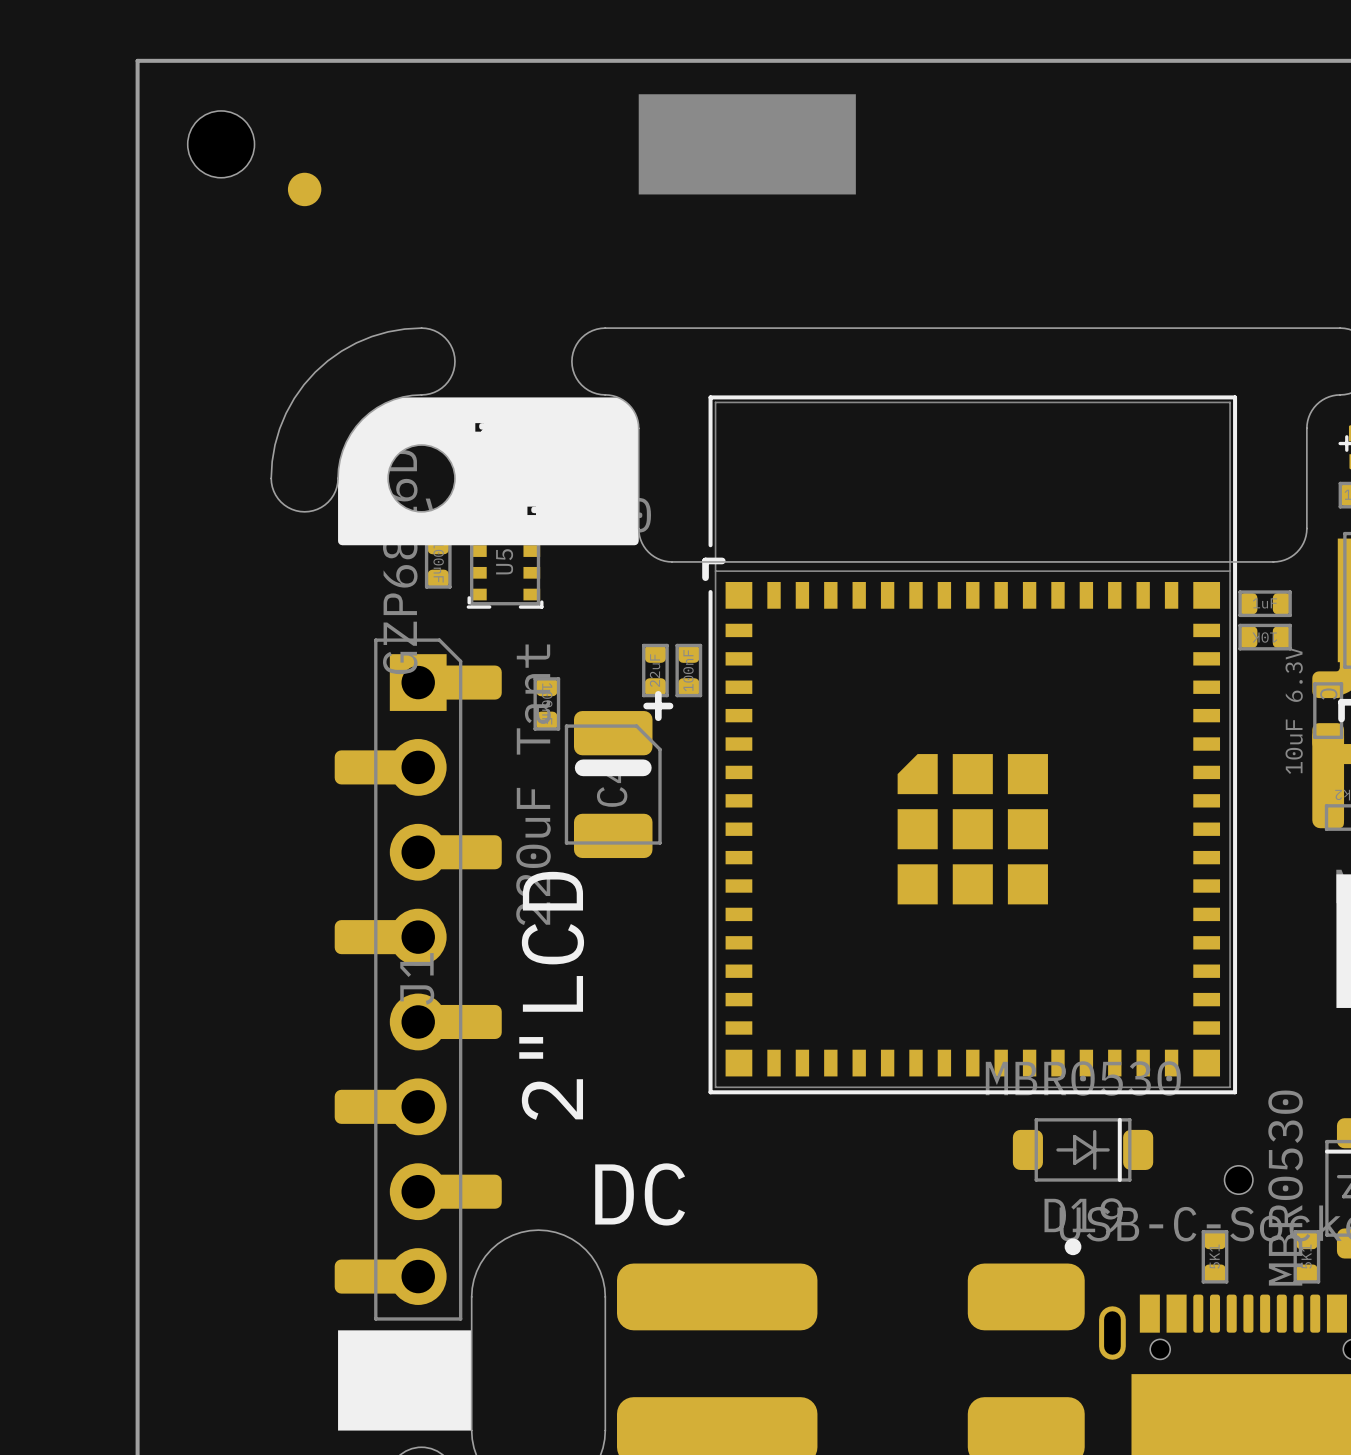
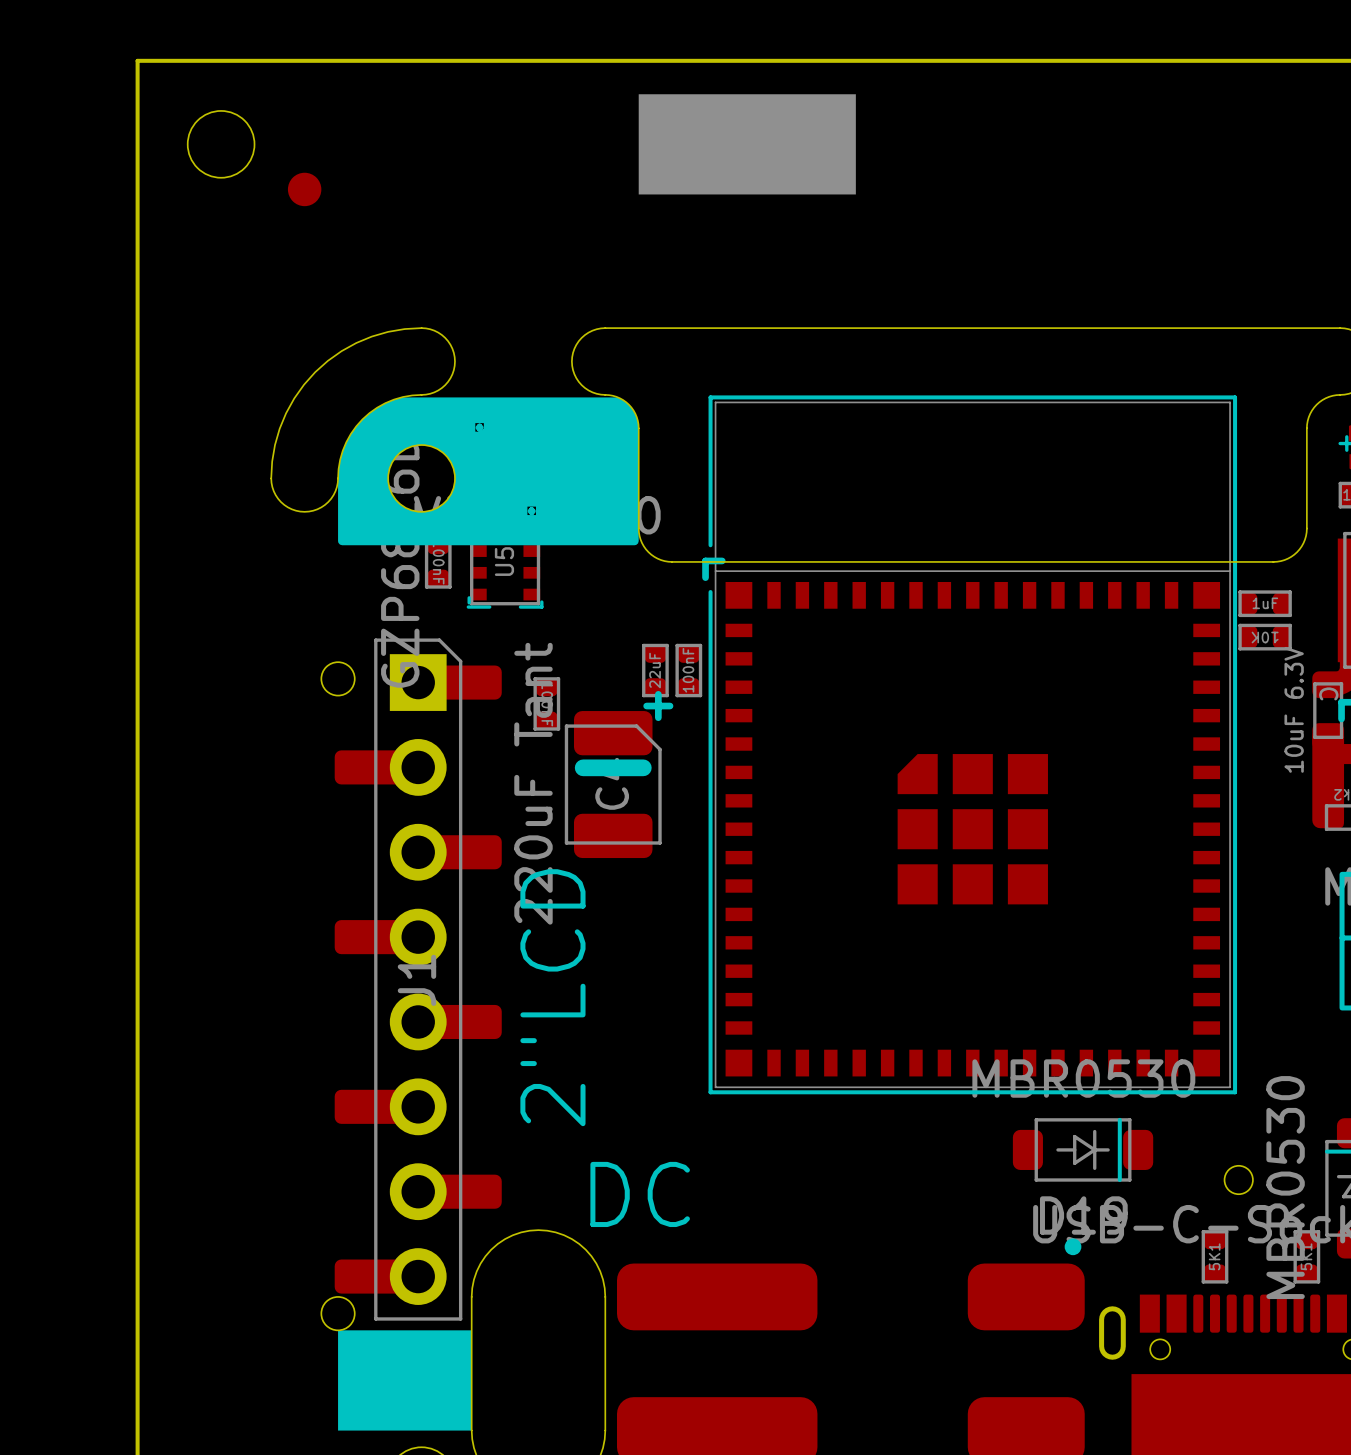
round board edge: none -> [320, 661, 356, 697]
round board edge: none -> [320, 1296, 356, 1332]

